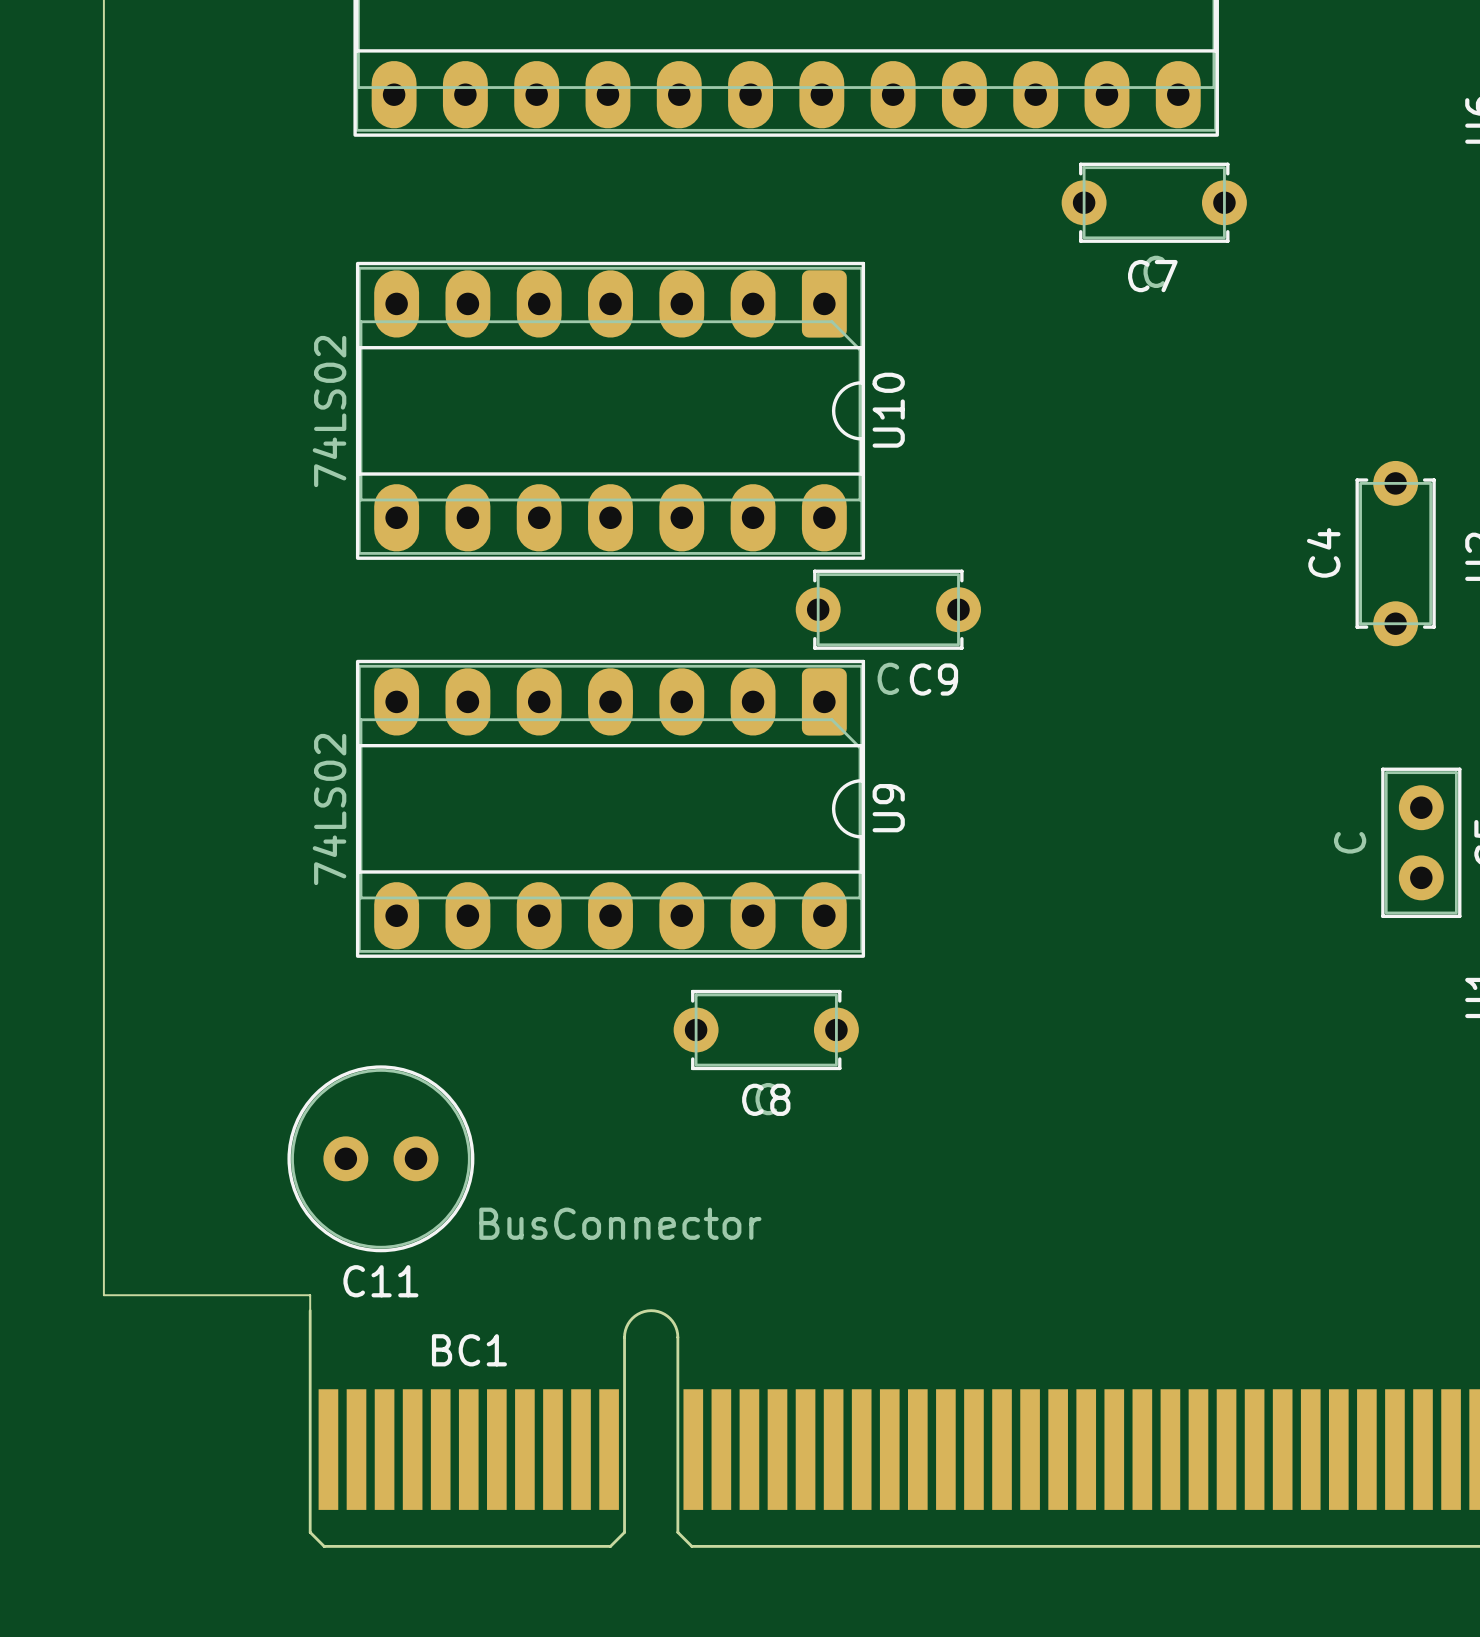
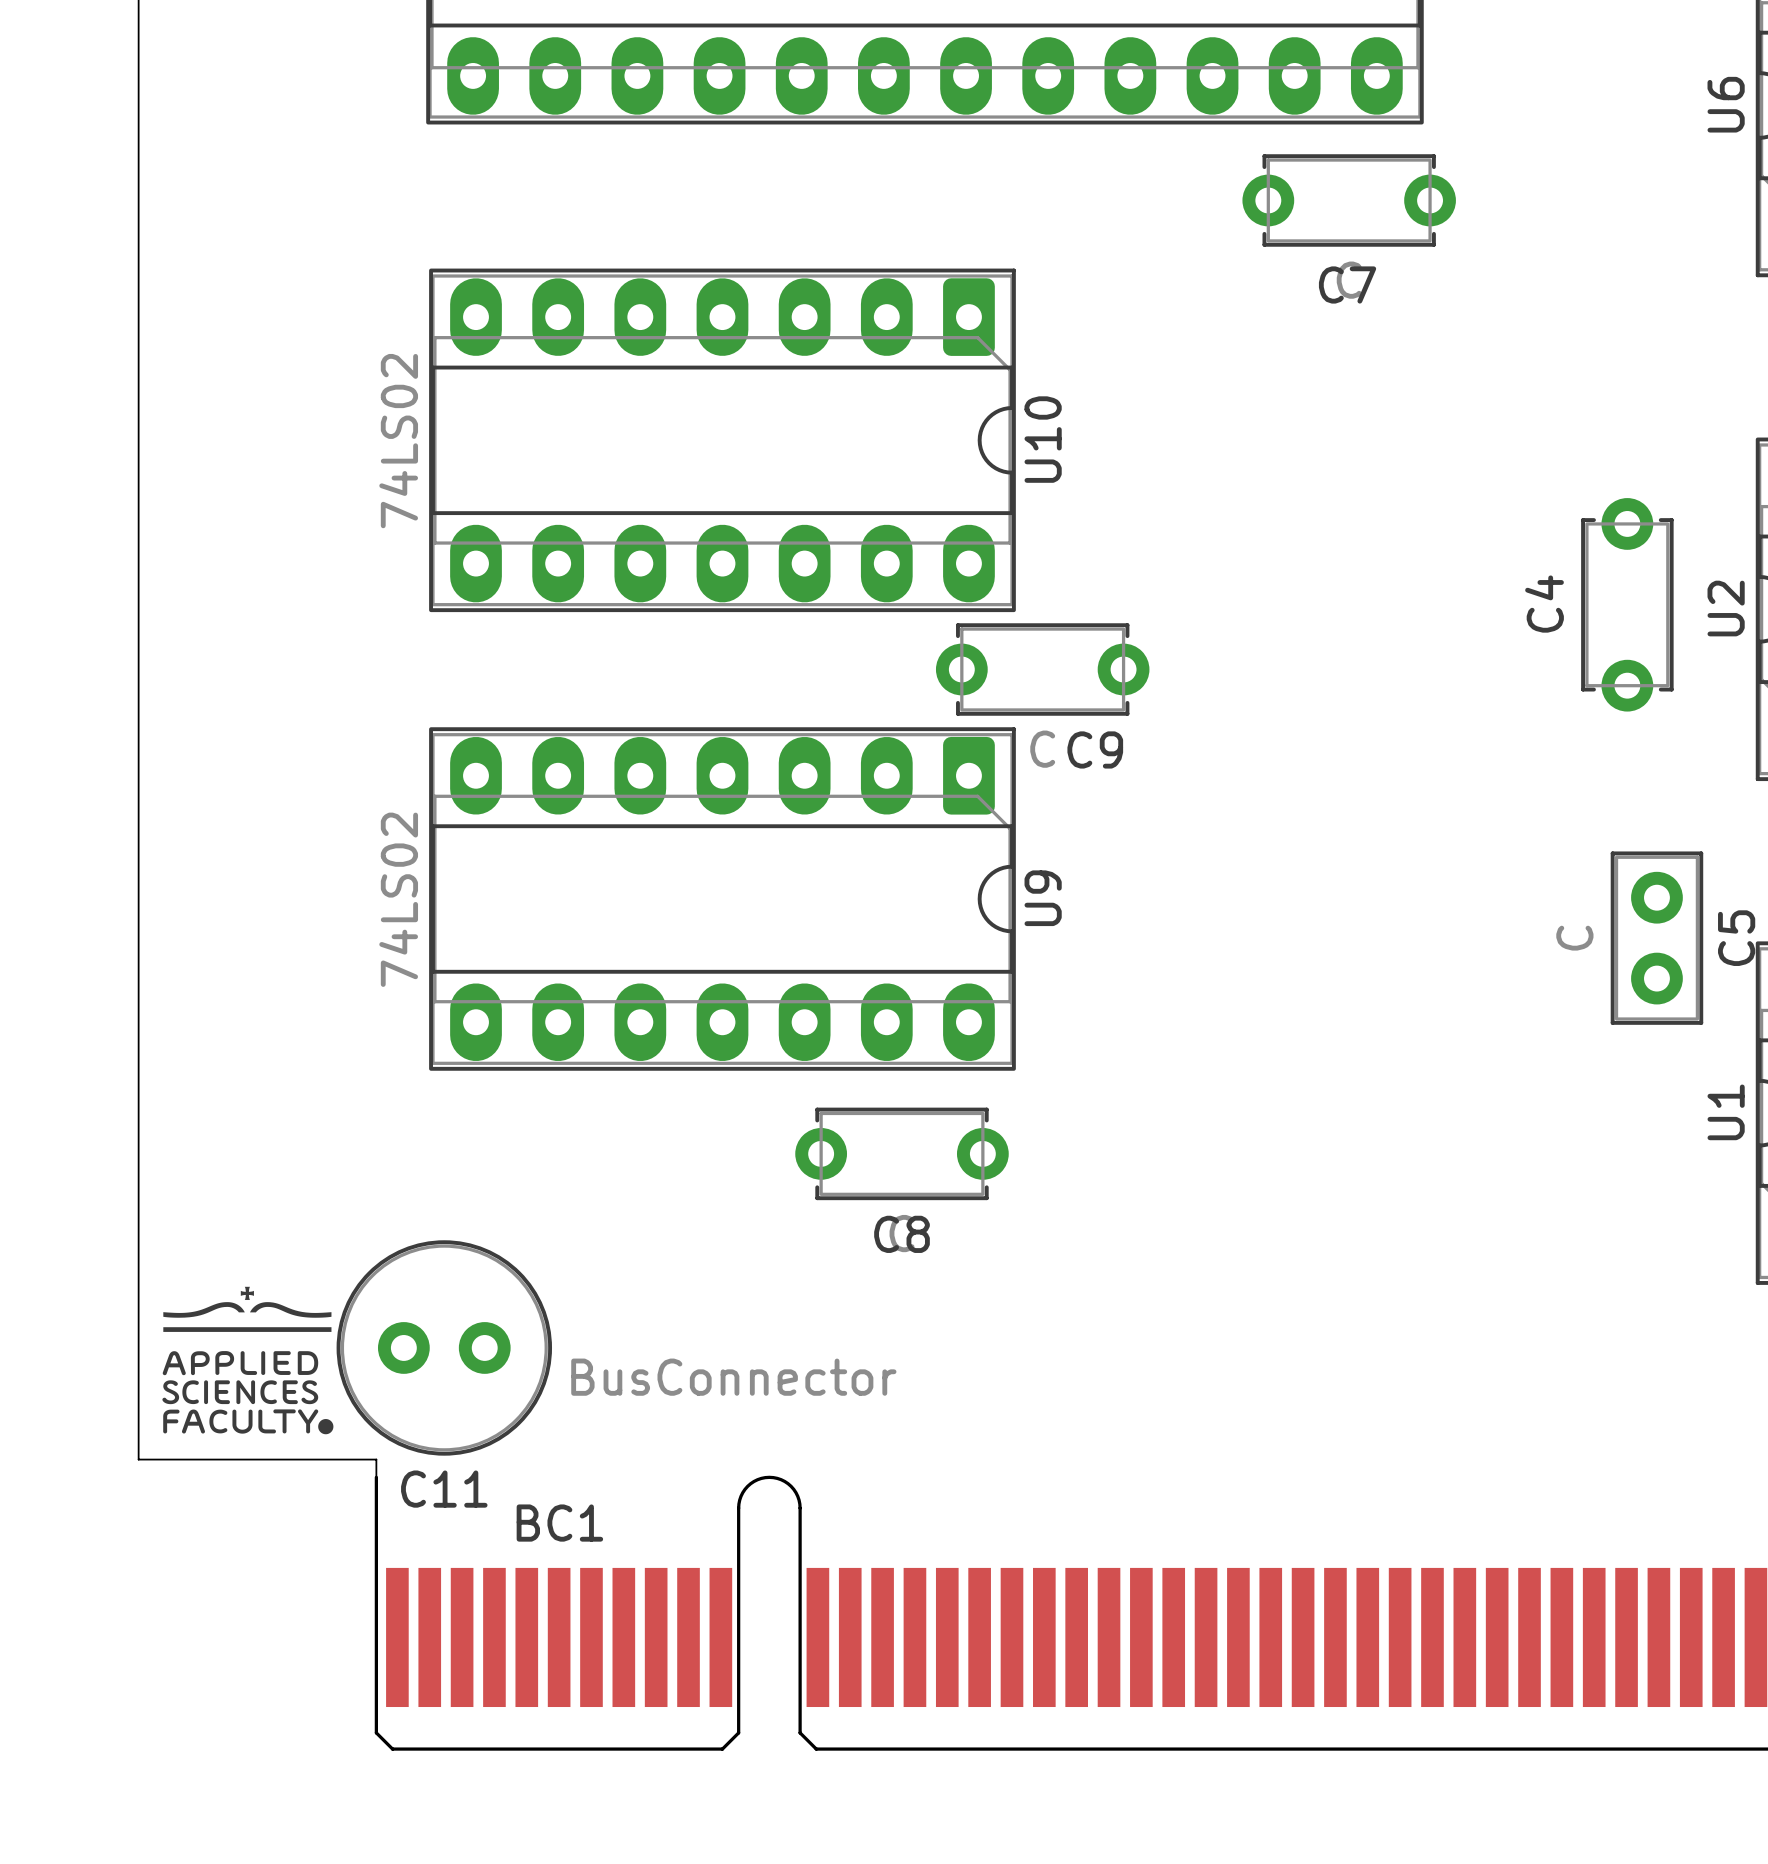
drawing: none -> [162, 1286, 334, 1435]
C11 position: (380, 1158) -> (444, 1347)

